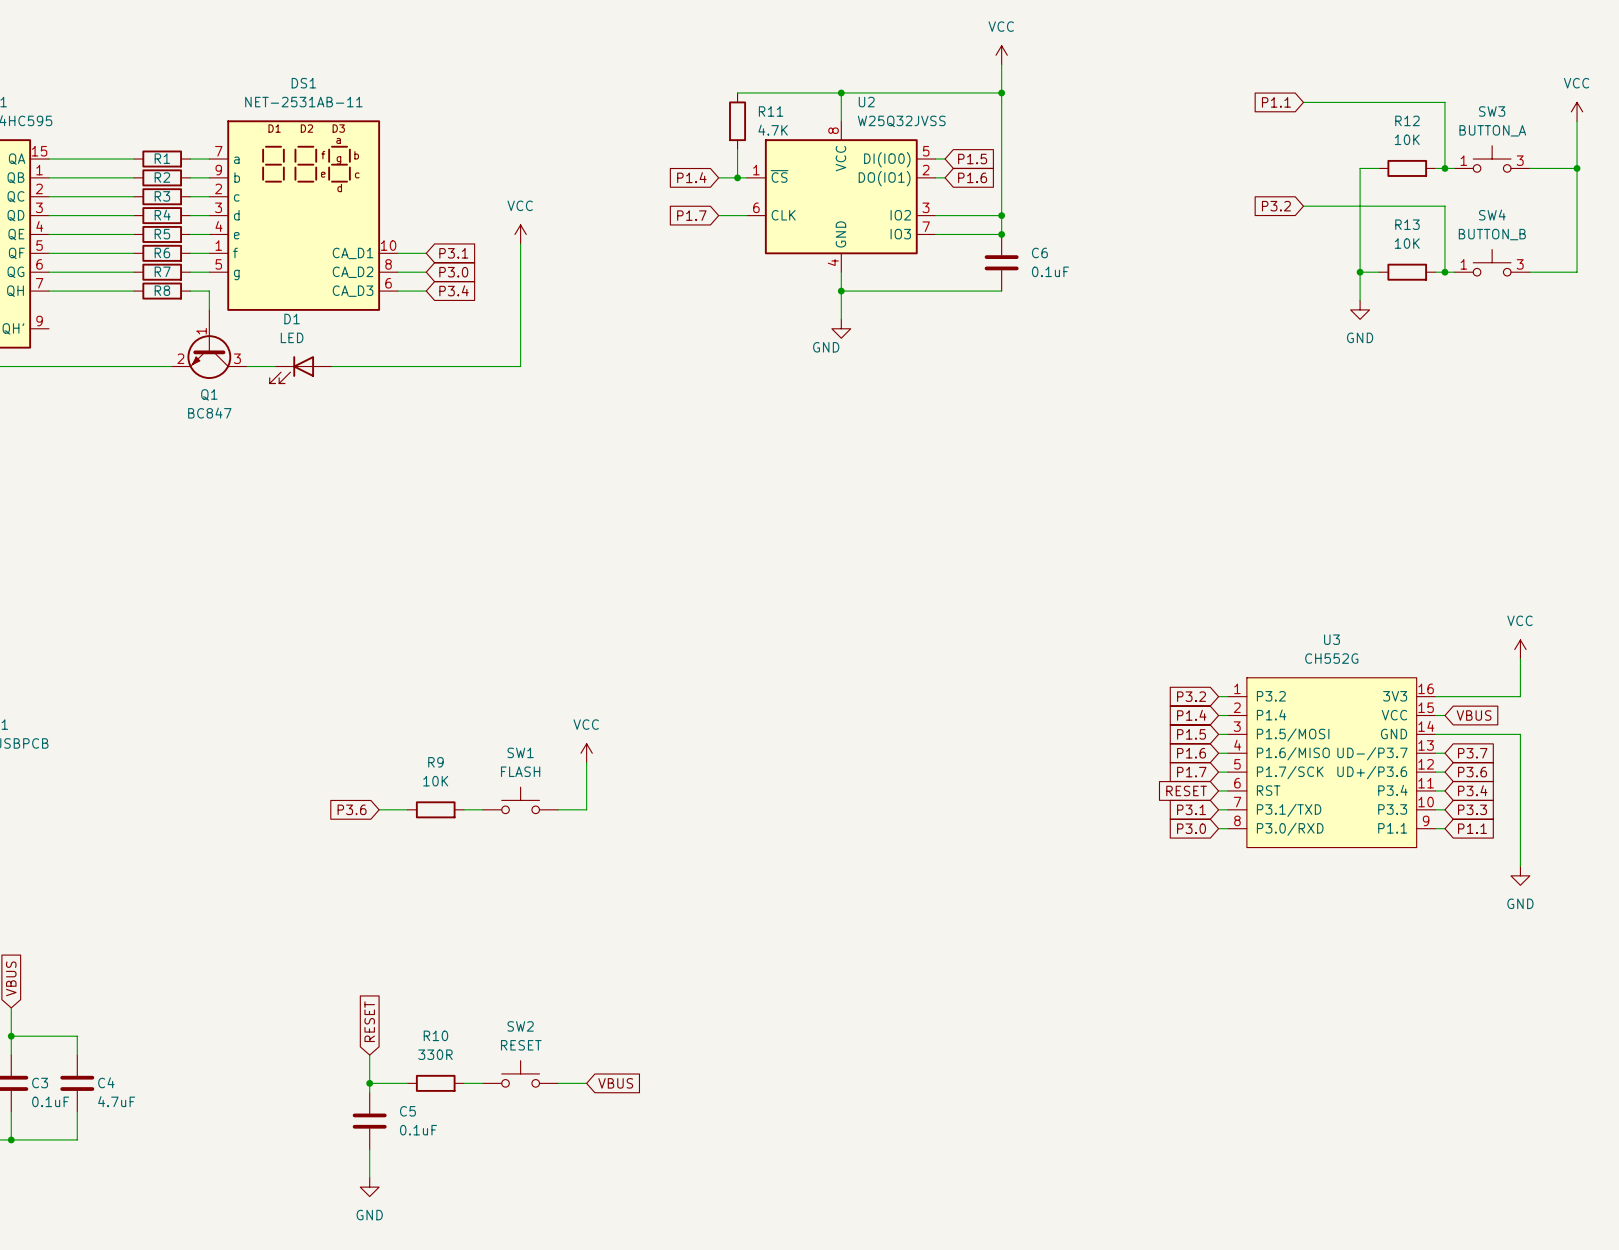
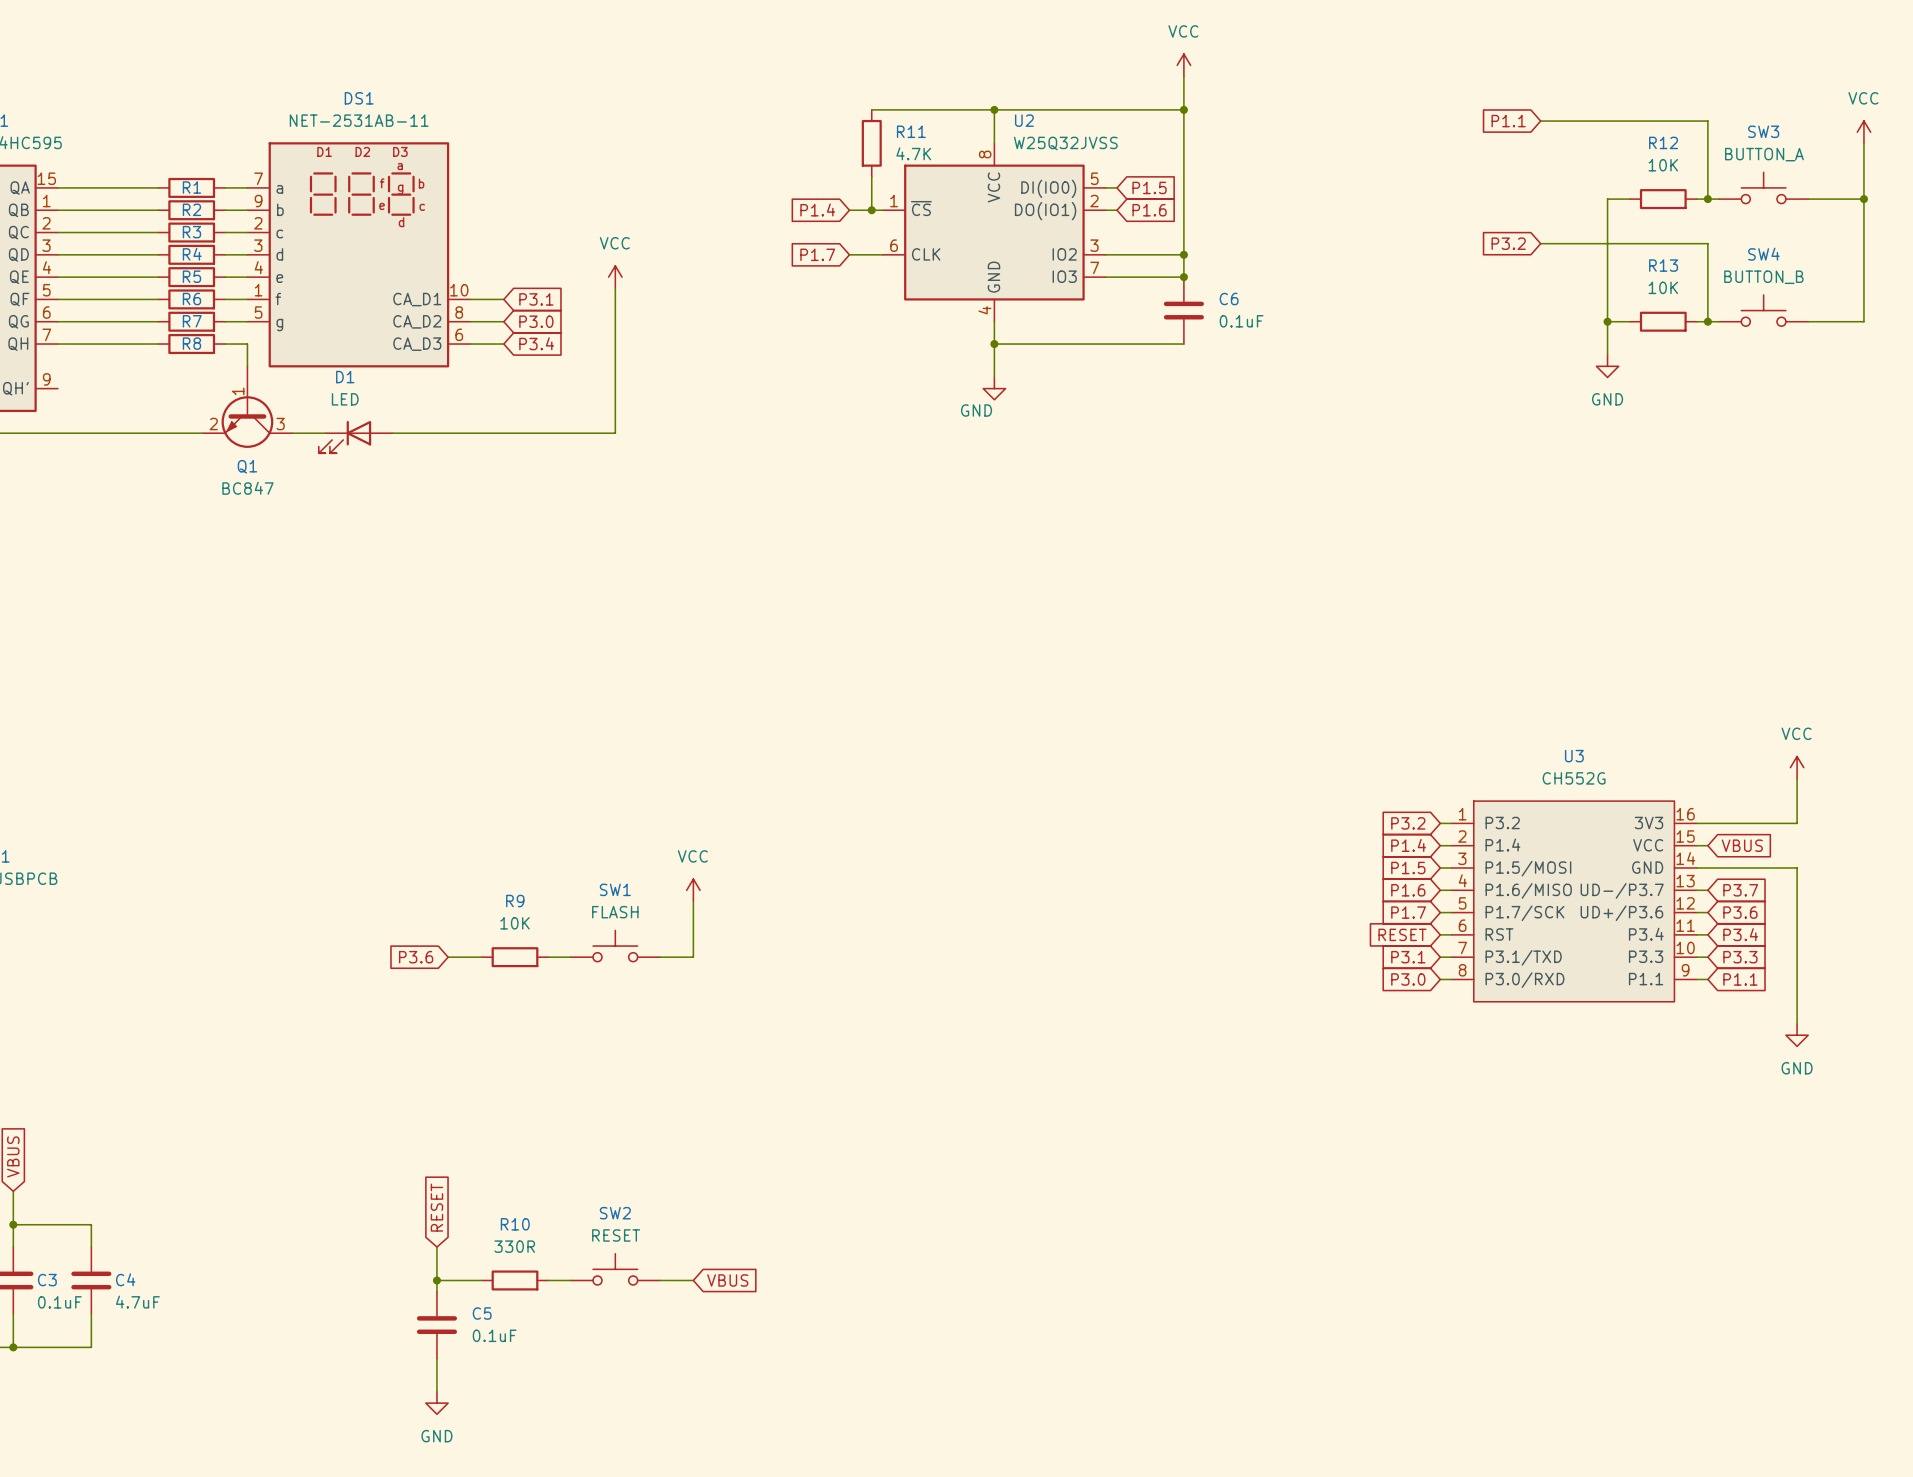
SW3 pin number: 1 (1463, 160) -> none
SW3 pin number: 3 (1520, 160) -> none
SW4 pin number: 1 (1463, 264) -> none
SW4 pin number: 3 (1520, 264) -> none

